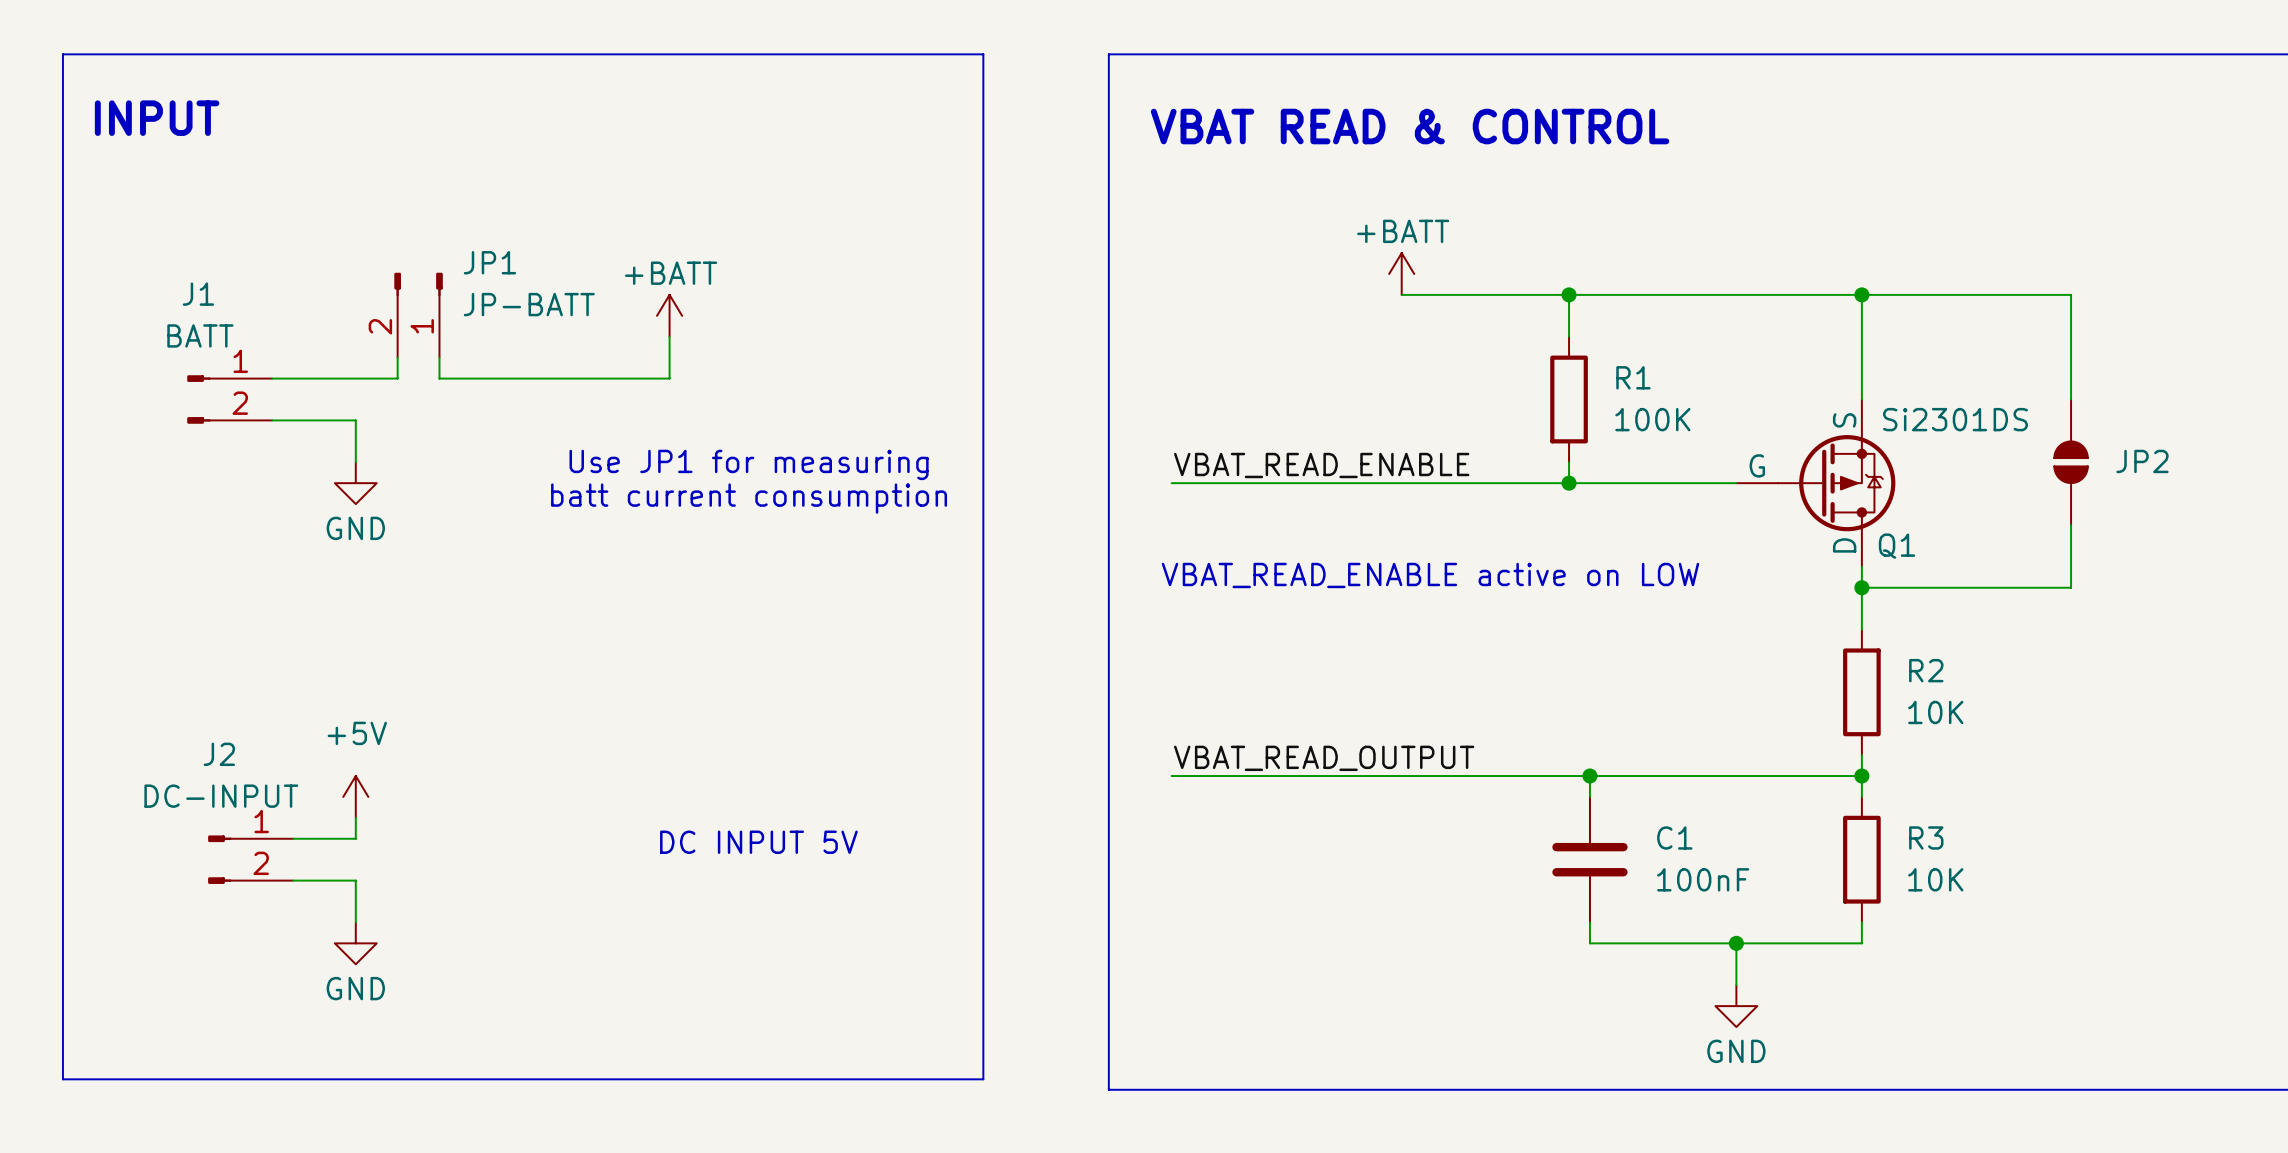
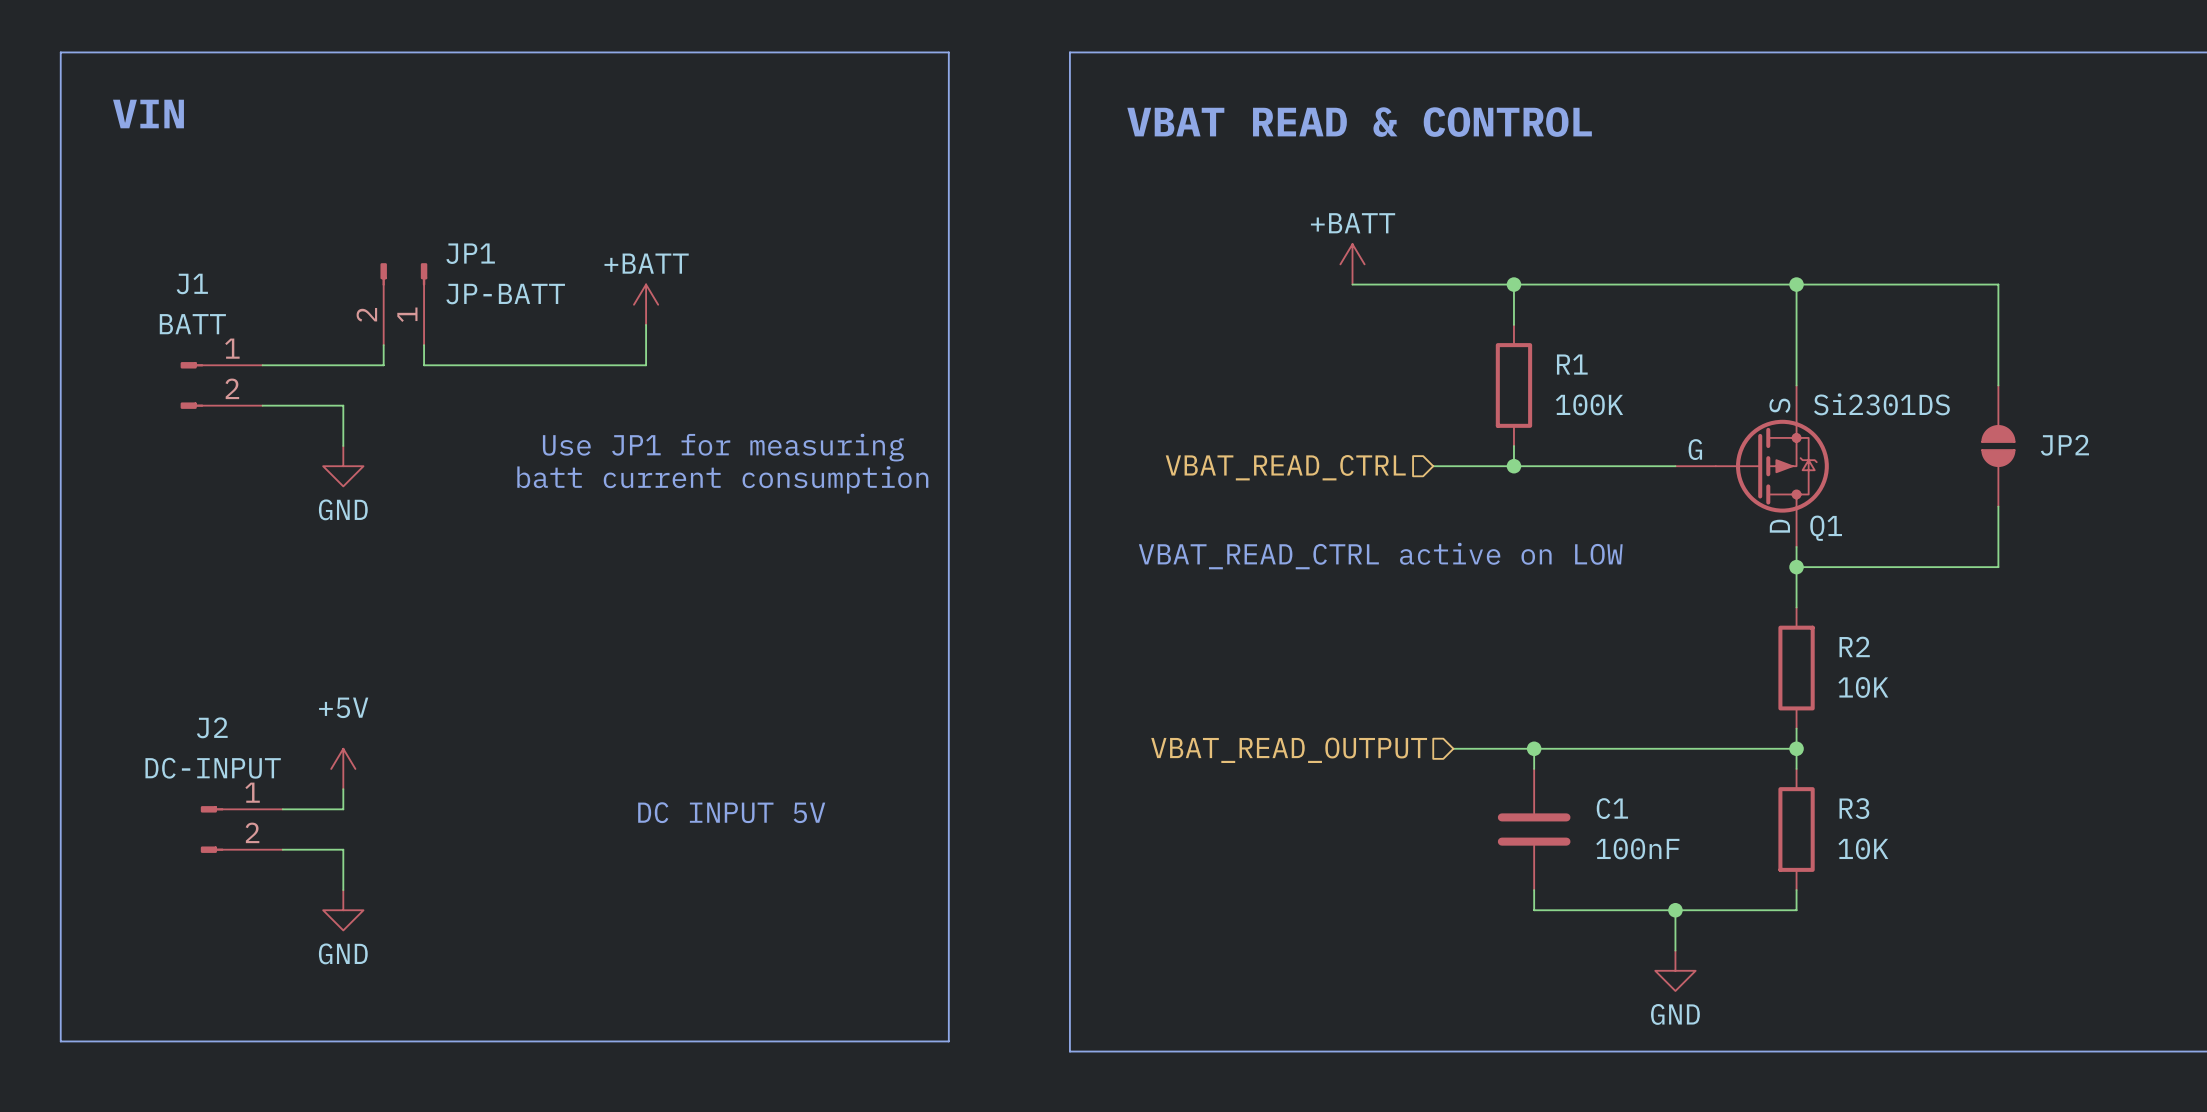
text: INPUT (157, 118) -> VIN (148, 114)
label: VBAT_READ_ENABLE (1321, 465) -> none
wire: (1171, 483) (1485, 483) -> none
hierarchical label: none -> VBAT_READ_CTRL (1285, 467)
text: VBAT_READ_ENABLE active on LOW (1430, 575) -> VBAT_READ_CTRL active on LOW (1380, 556)
label: VBAT_READ_OUTPUT (1324, 758) -> none
wire: (1171, 776) (1506, 776) -> none
hierarchical label: none -> VBAT_READ_OUTPUT (1289, 750)

